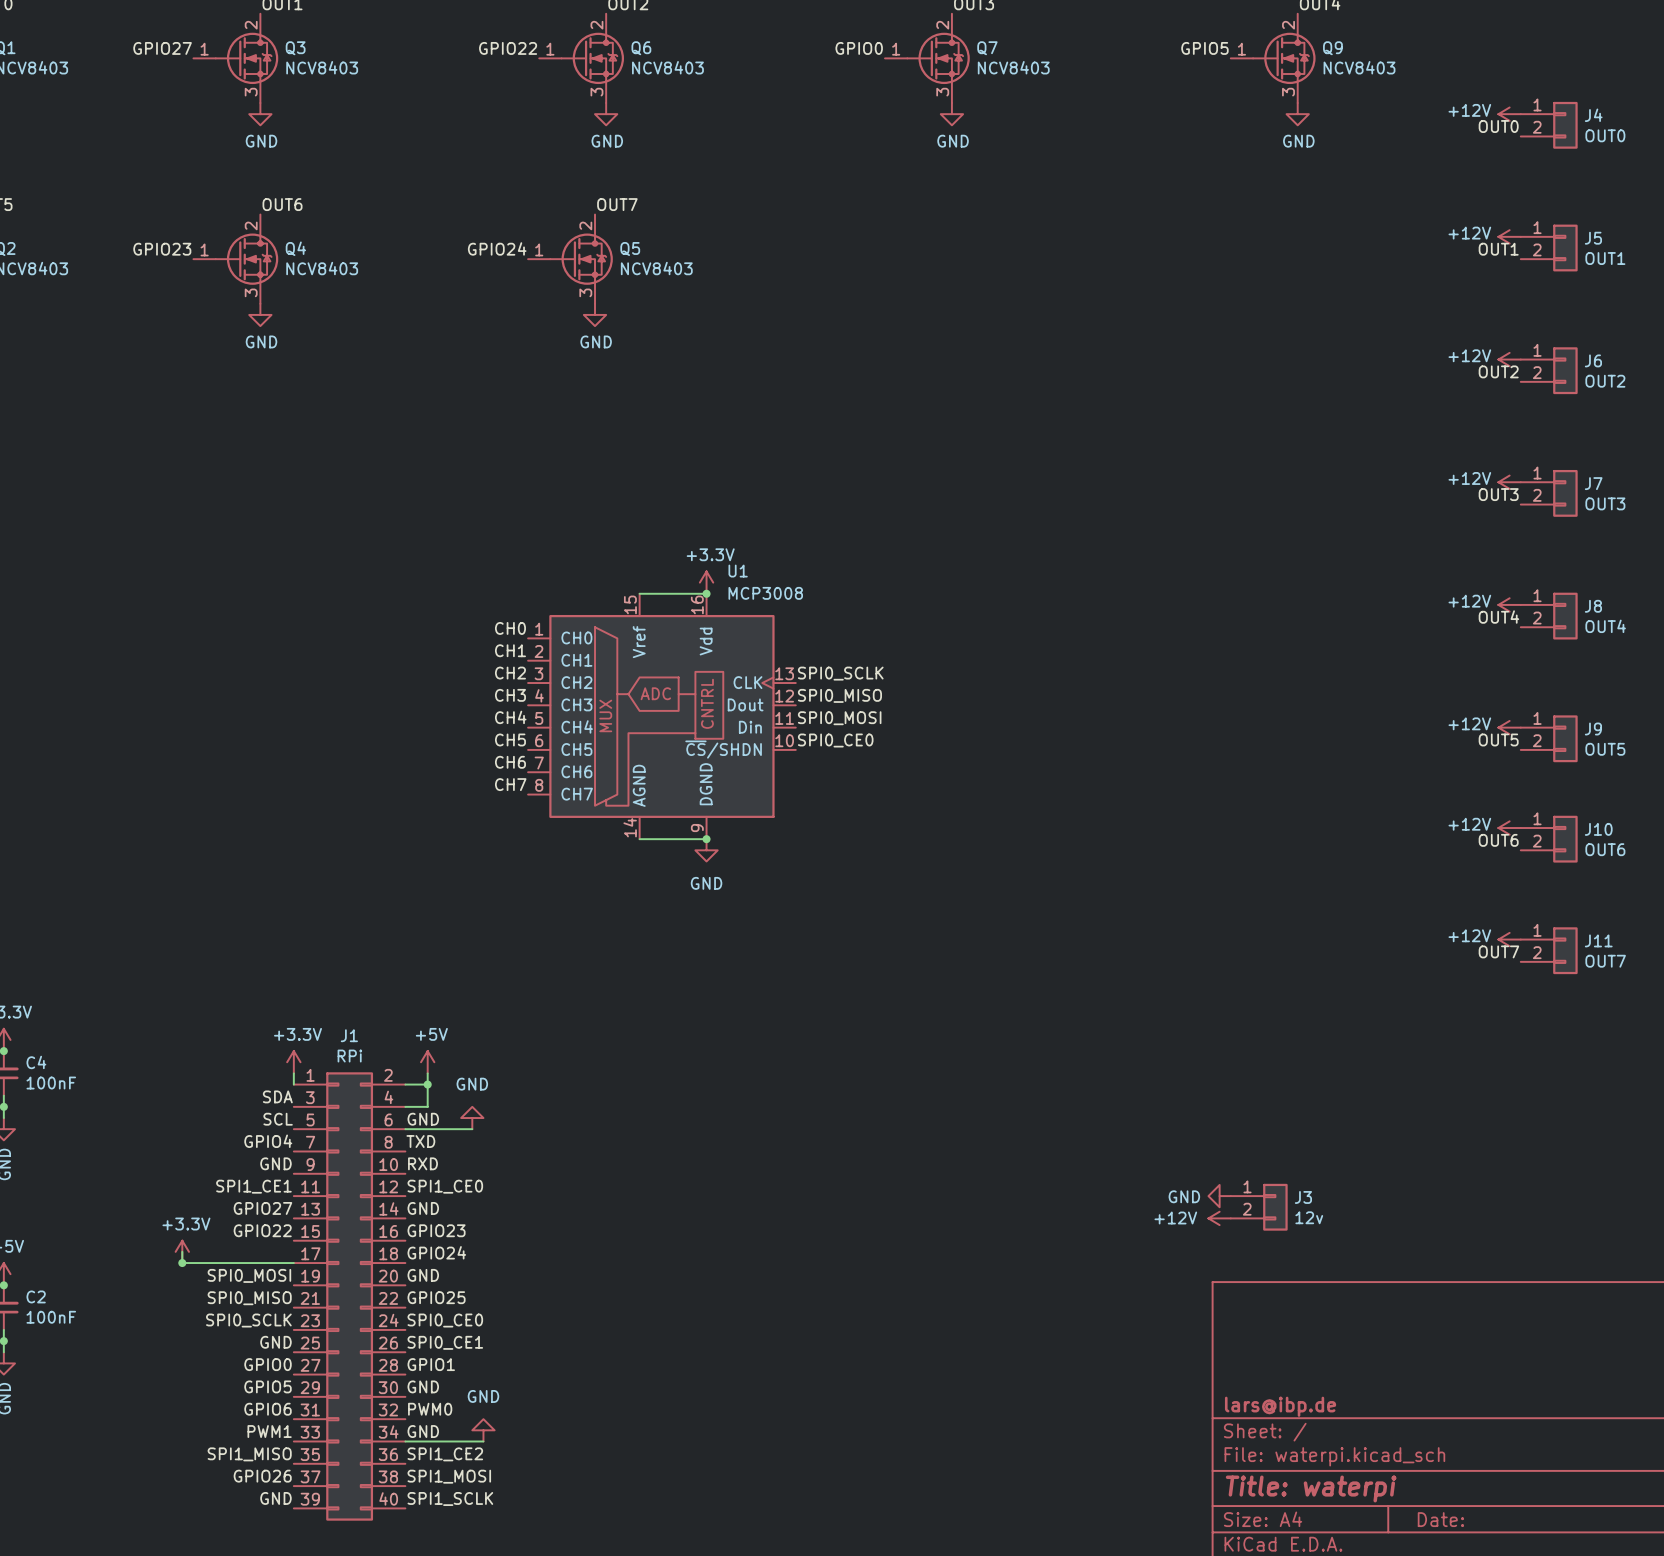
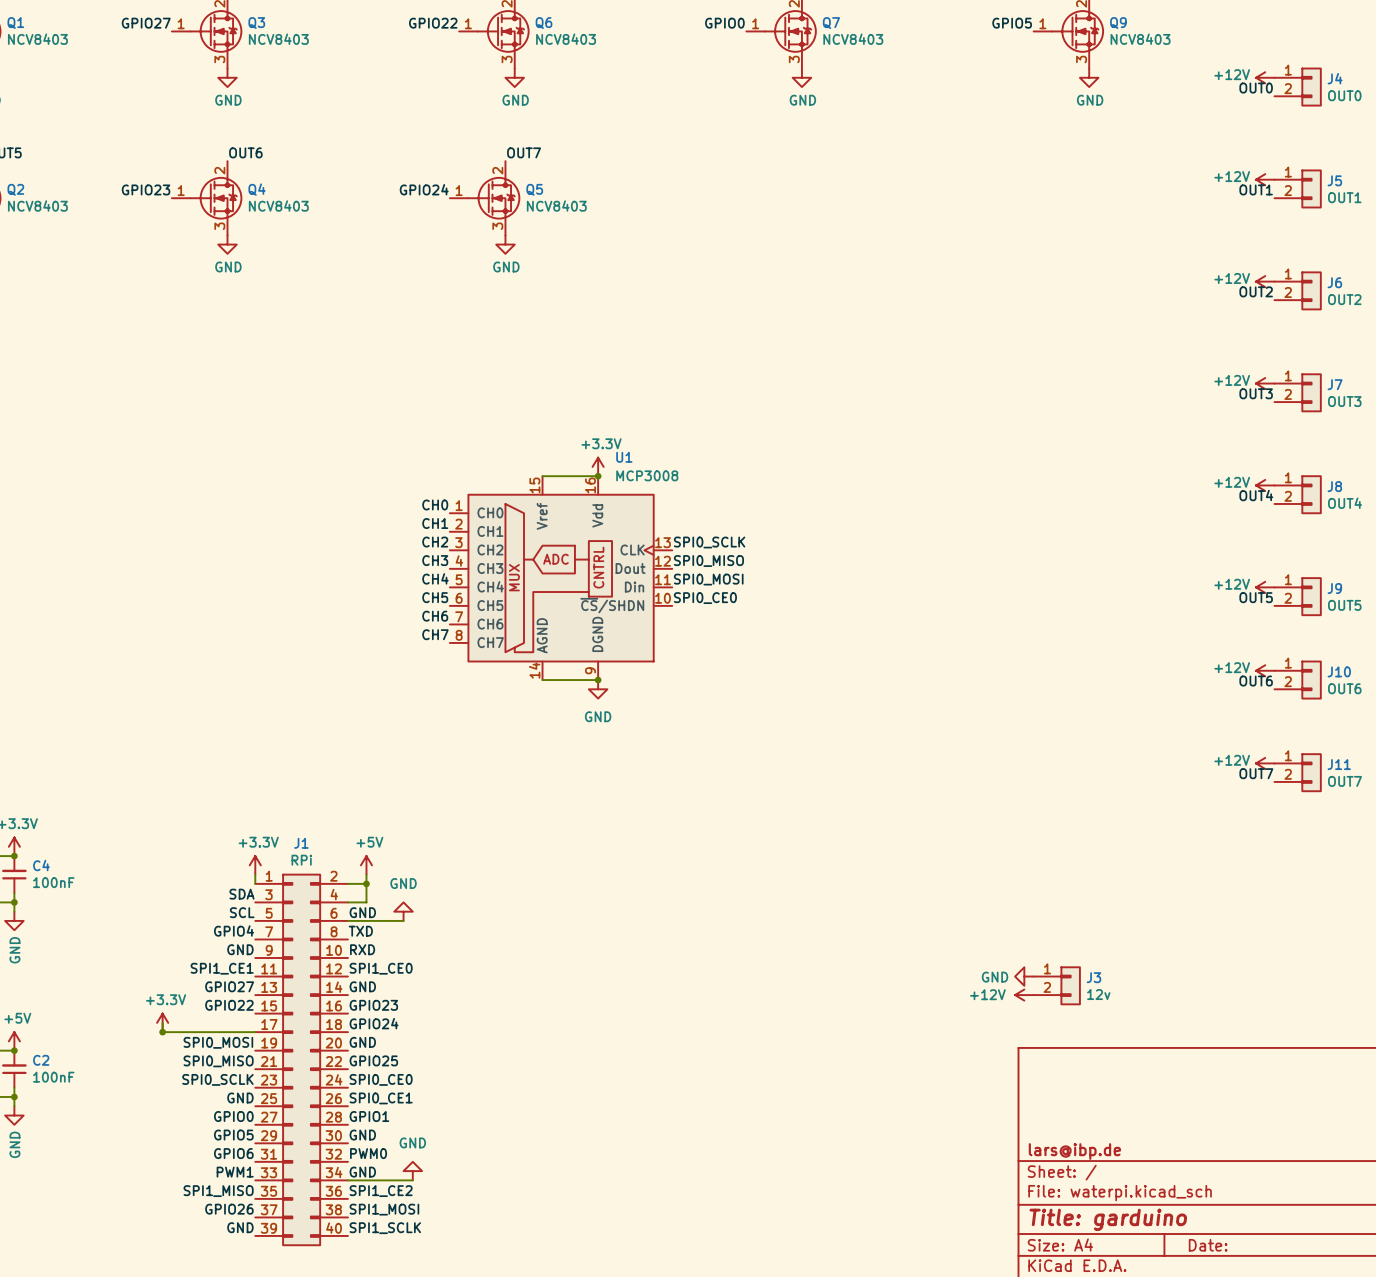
title block: Title: waterpi (1311, 1488) -> Title: garduino (1108, 1219)

